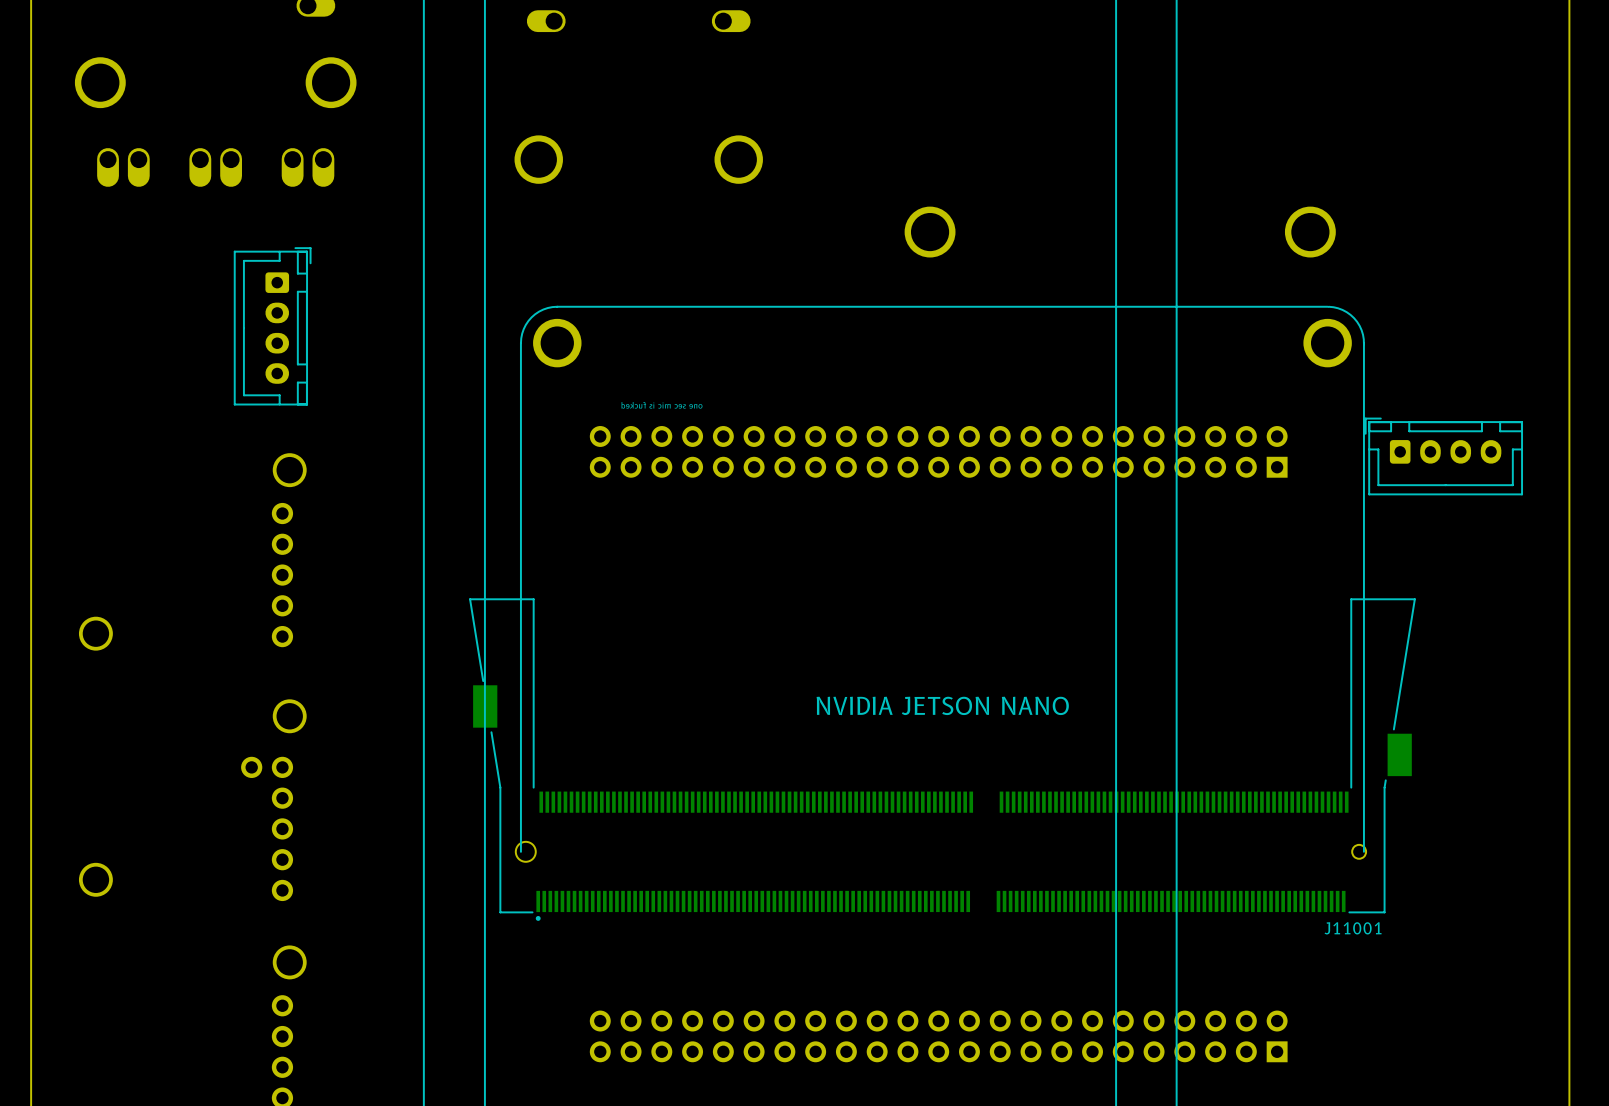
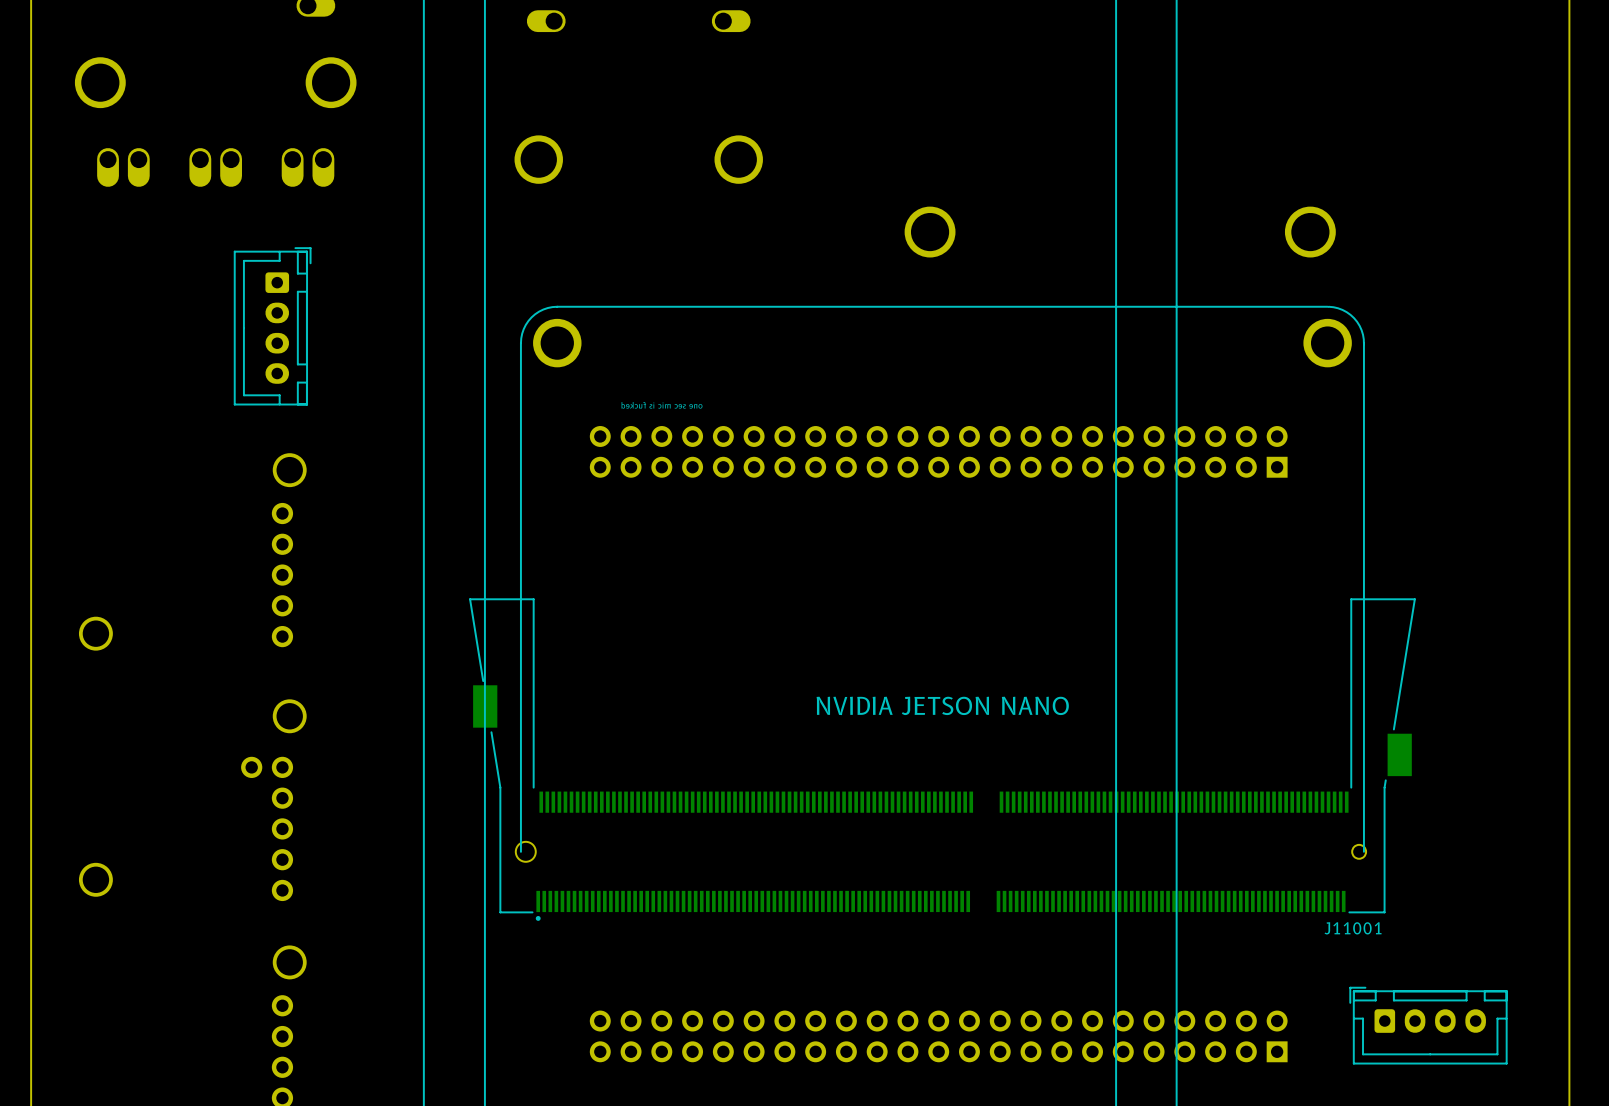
part: (1443, 456) -> none
part: none -> (1428, 1025)

